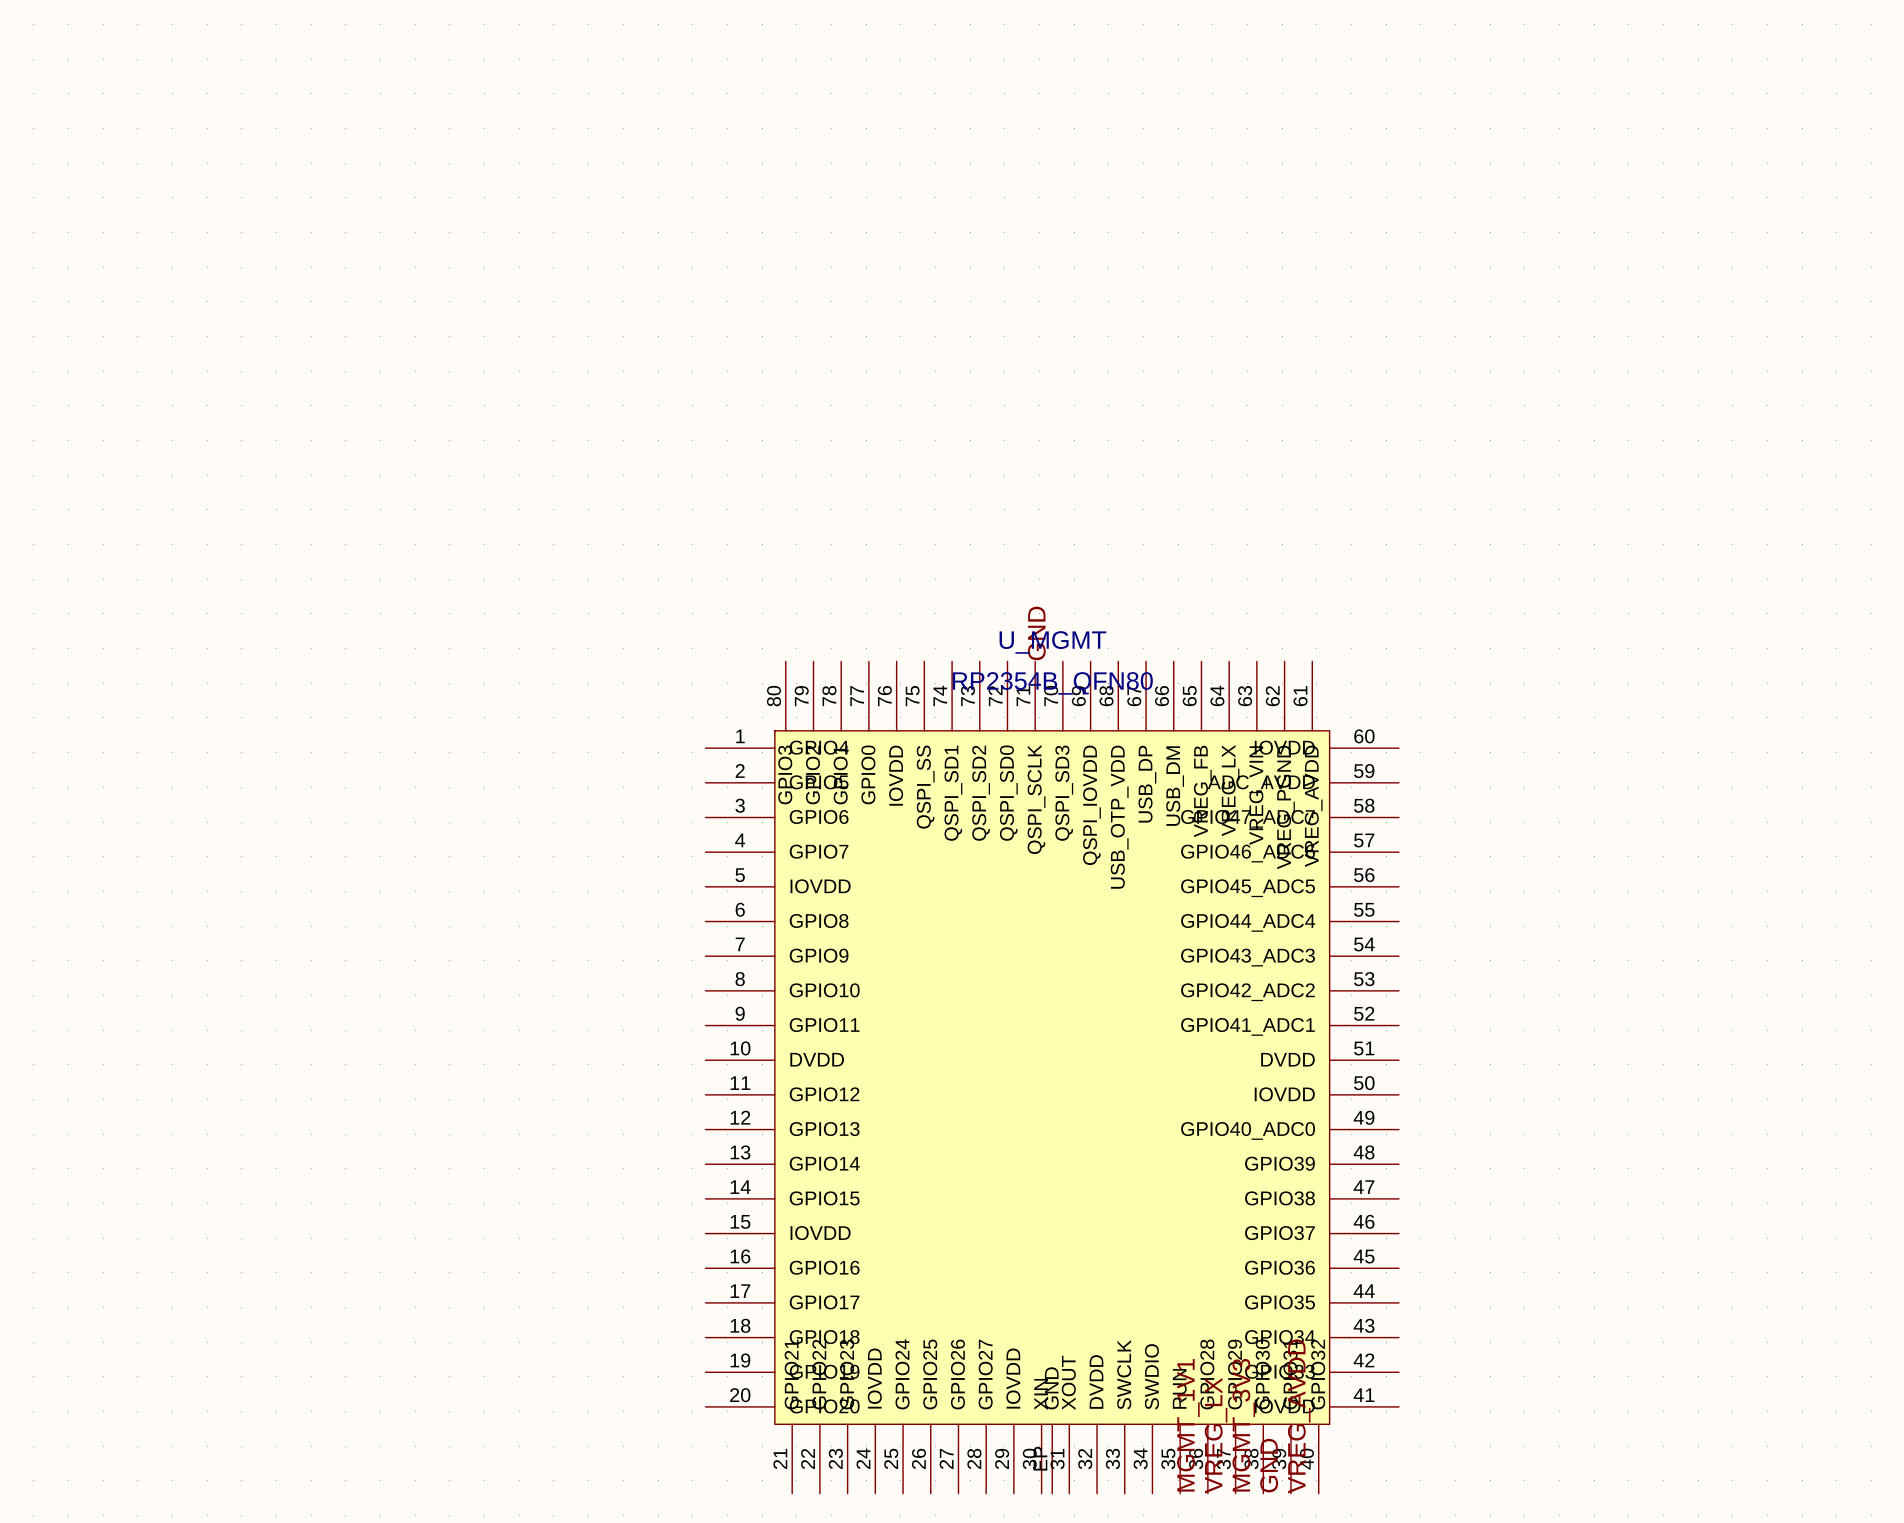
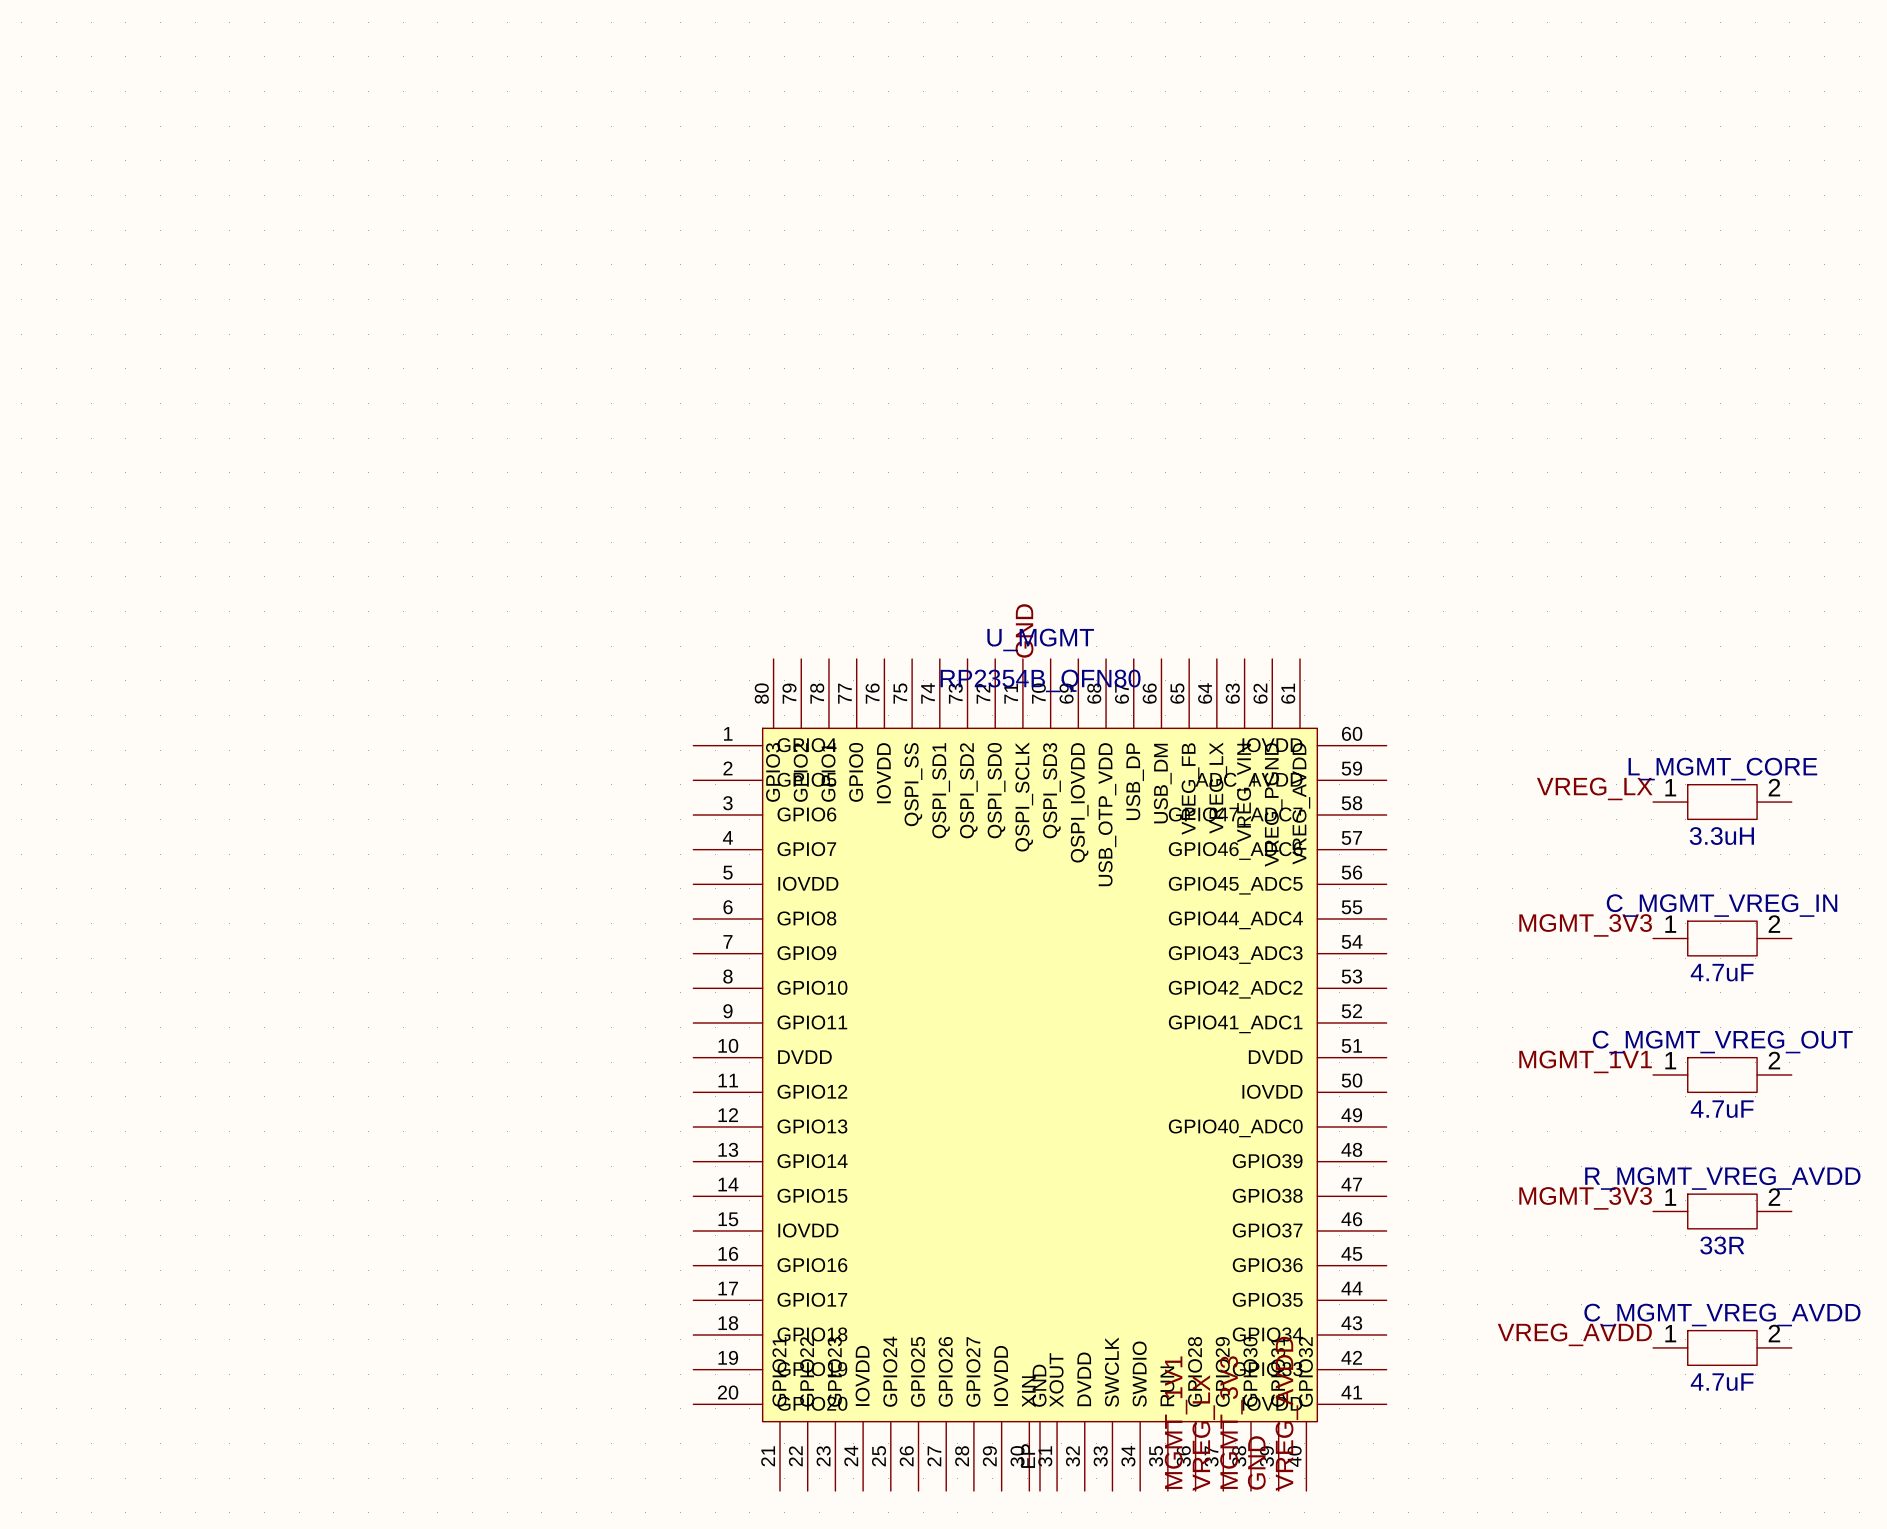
label: none -> VREG_LX (1594, 788)
L_MGMT_CORE: none -> 3.3uH (1722, 802)
label: none -> MGMT_3V3 (1585, 925)
C_MGMT_VREG_IN: none -> 4.7uF (1722, 938)
label: none -> MGMT_1V1 (1585, 1061)
C_MGMT_VREG_OUT: none -> 4.7uF (1722, 1074)
label: none -> MGMT_3V3 (1585, 1198)
R_MGMT_VREG_AVDD: none -> 33R (1722, 1211)
label: none -> VREG_AVDD (1574, 1334)
C_MGMT_VREG_AVDD: none -> 4.7uF (1722, 1347)

